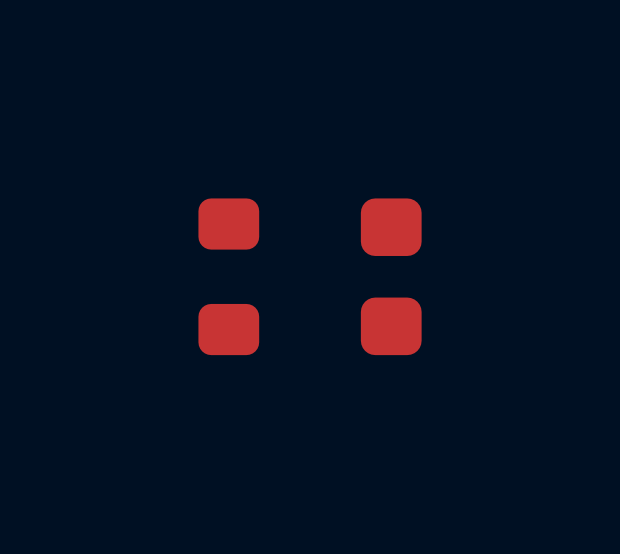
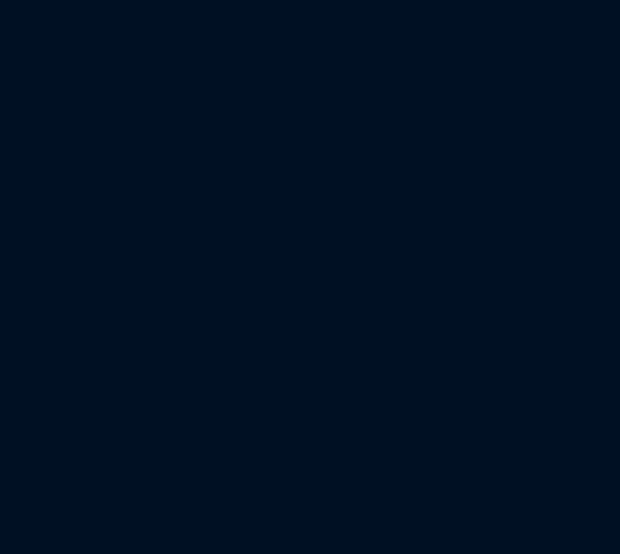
part: (228, 276) -> none
part: (391, 276) -> none

